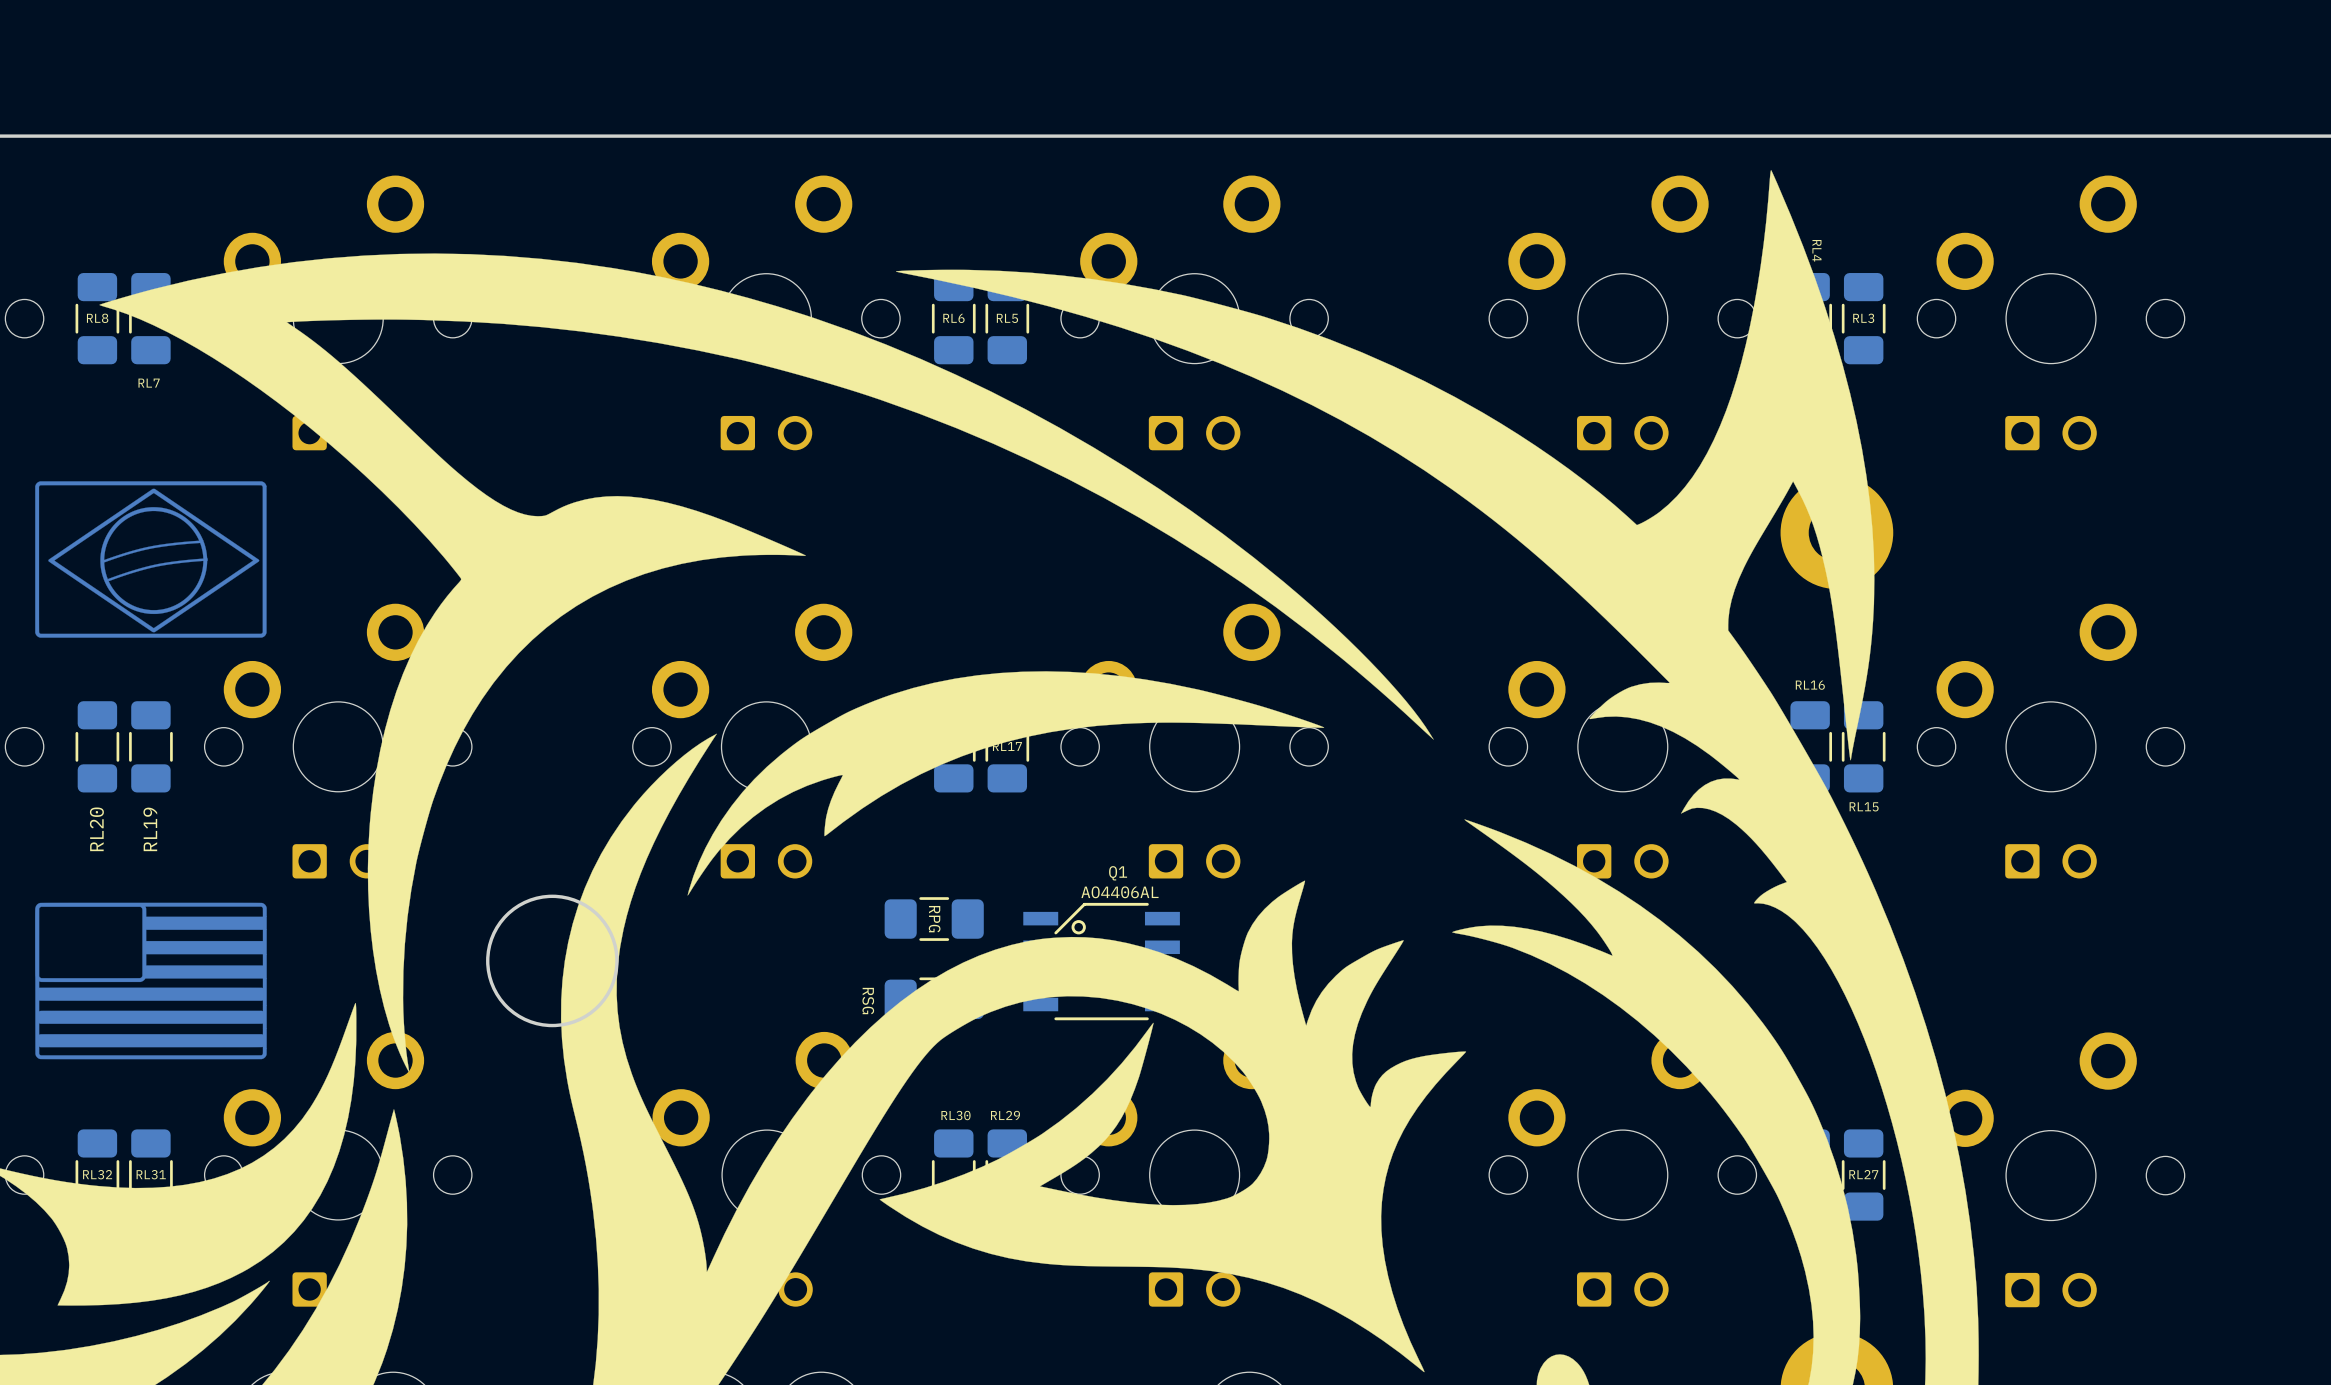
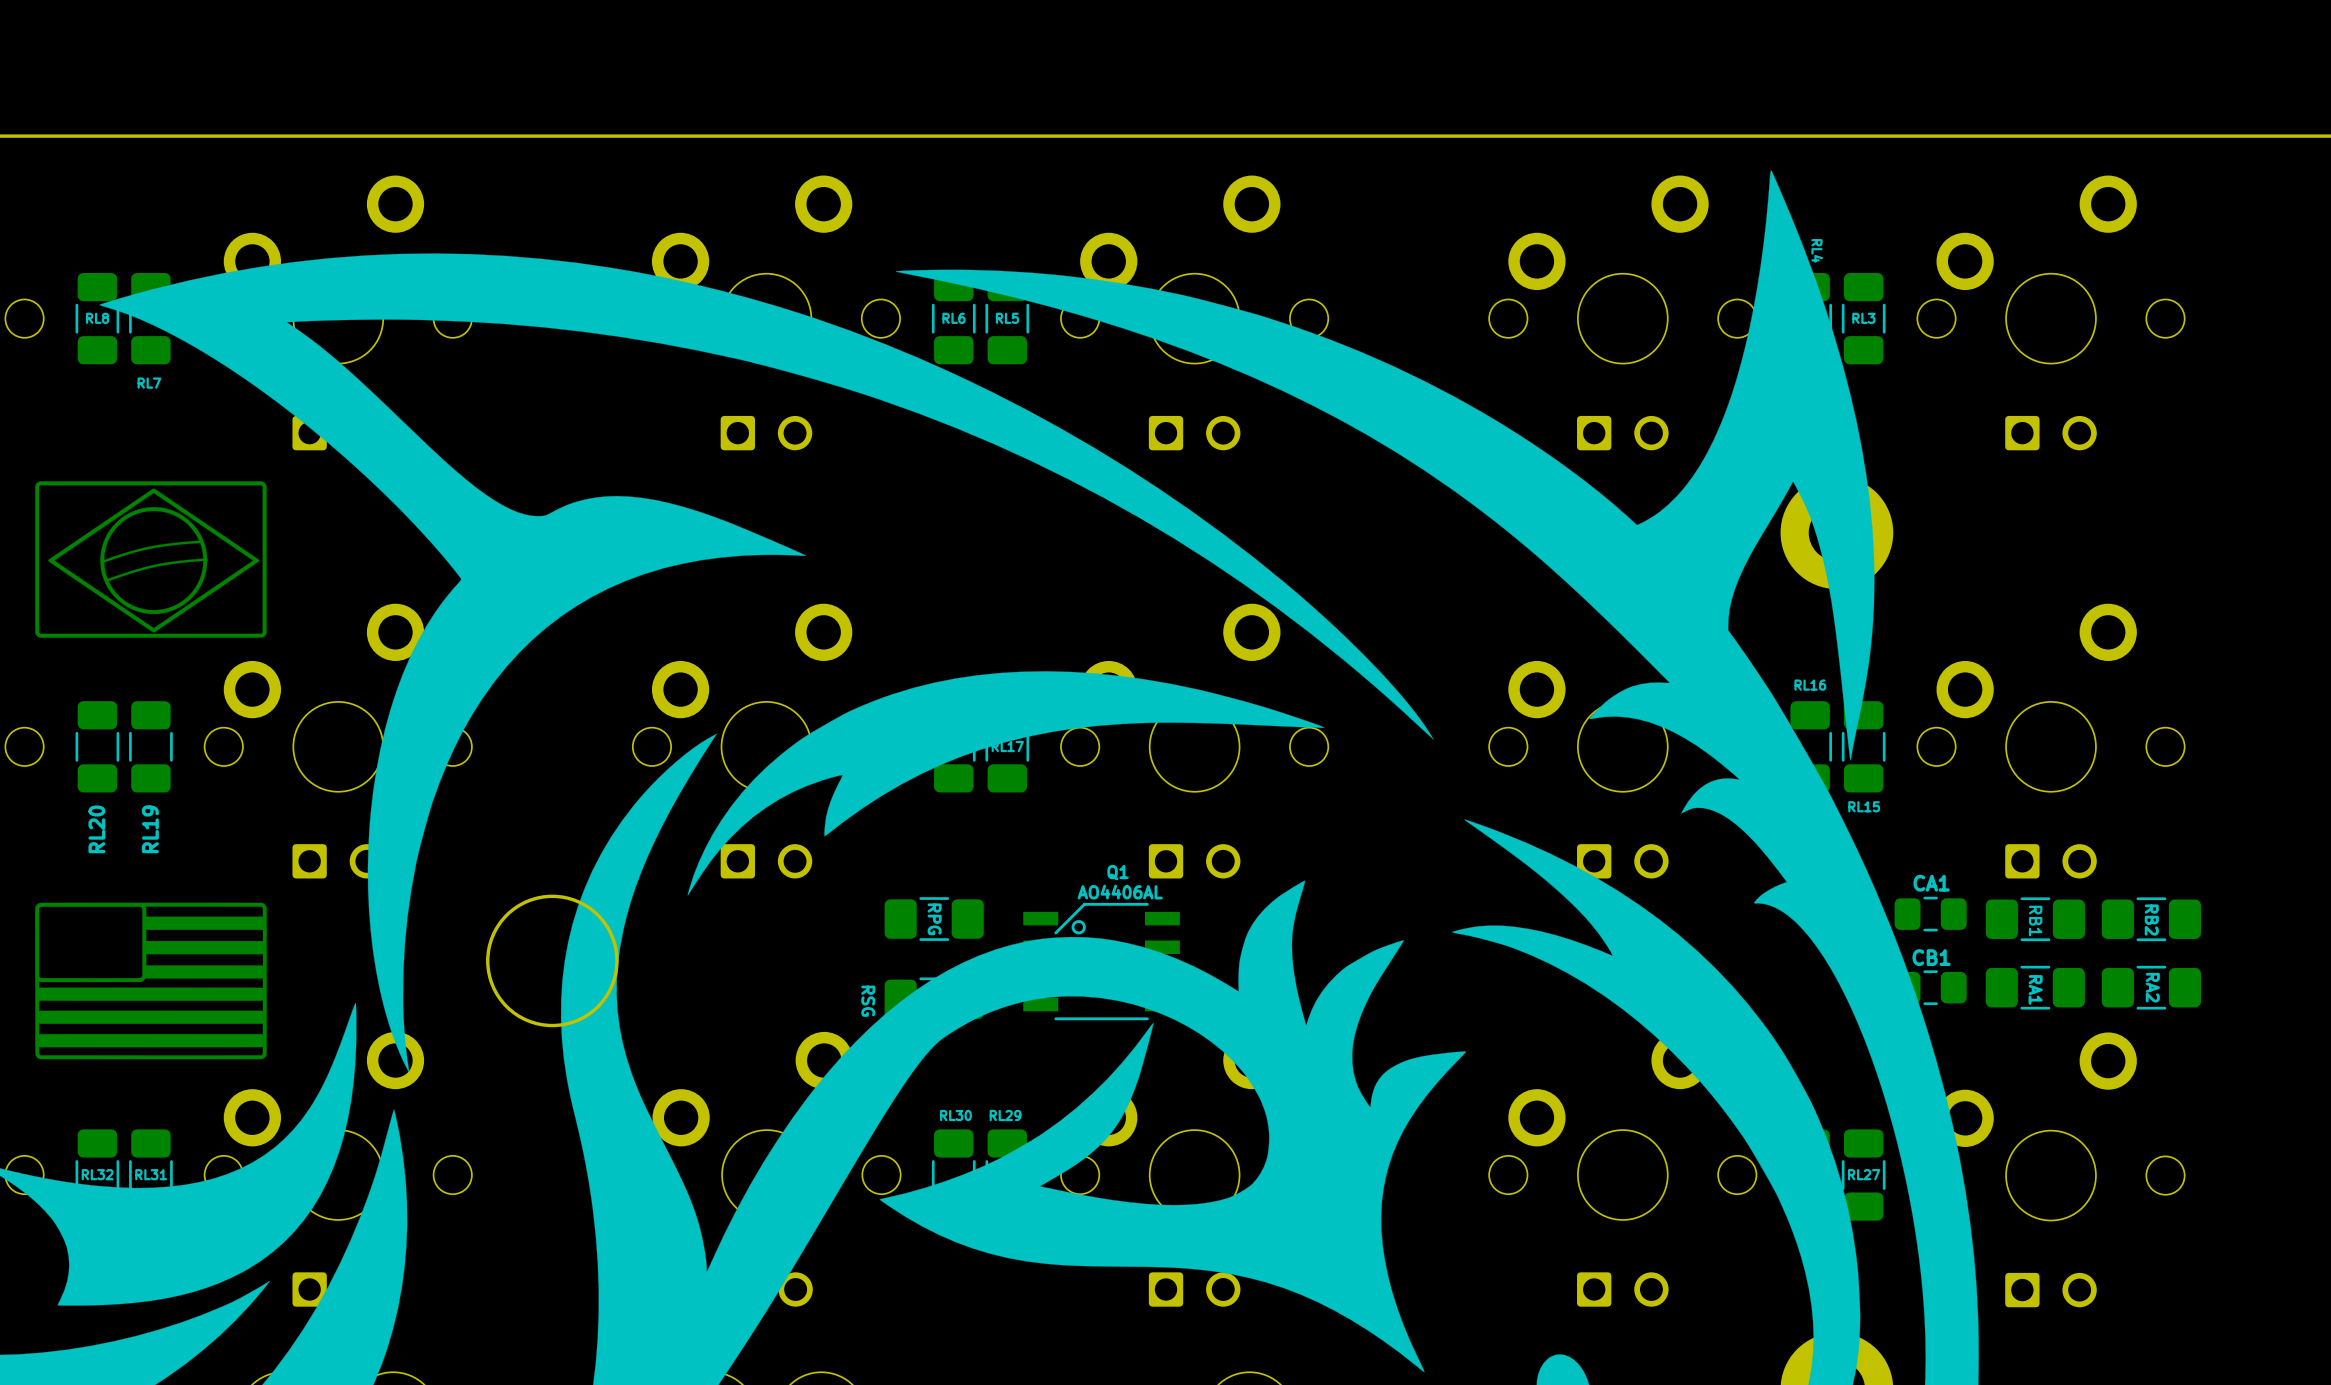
CA1: none -> (1930, 914)
RB1: none -> (2035, 919)
RB2: none -> (2151, 919)
CB1: none -> (1930, 987)
RA1: none -> (2035, 987)
RA2: none -> (2151, 987)

